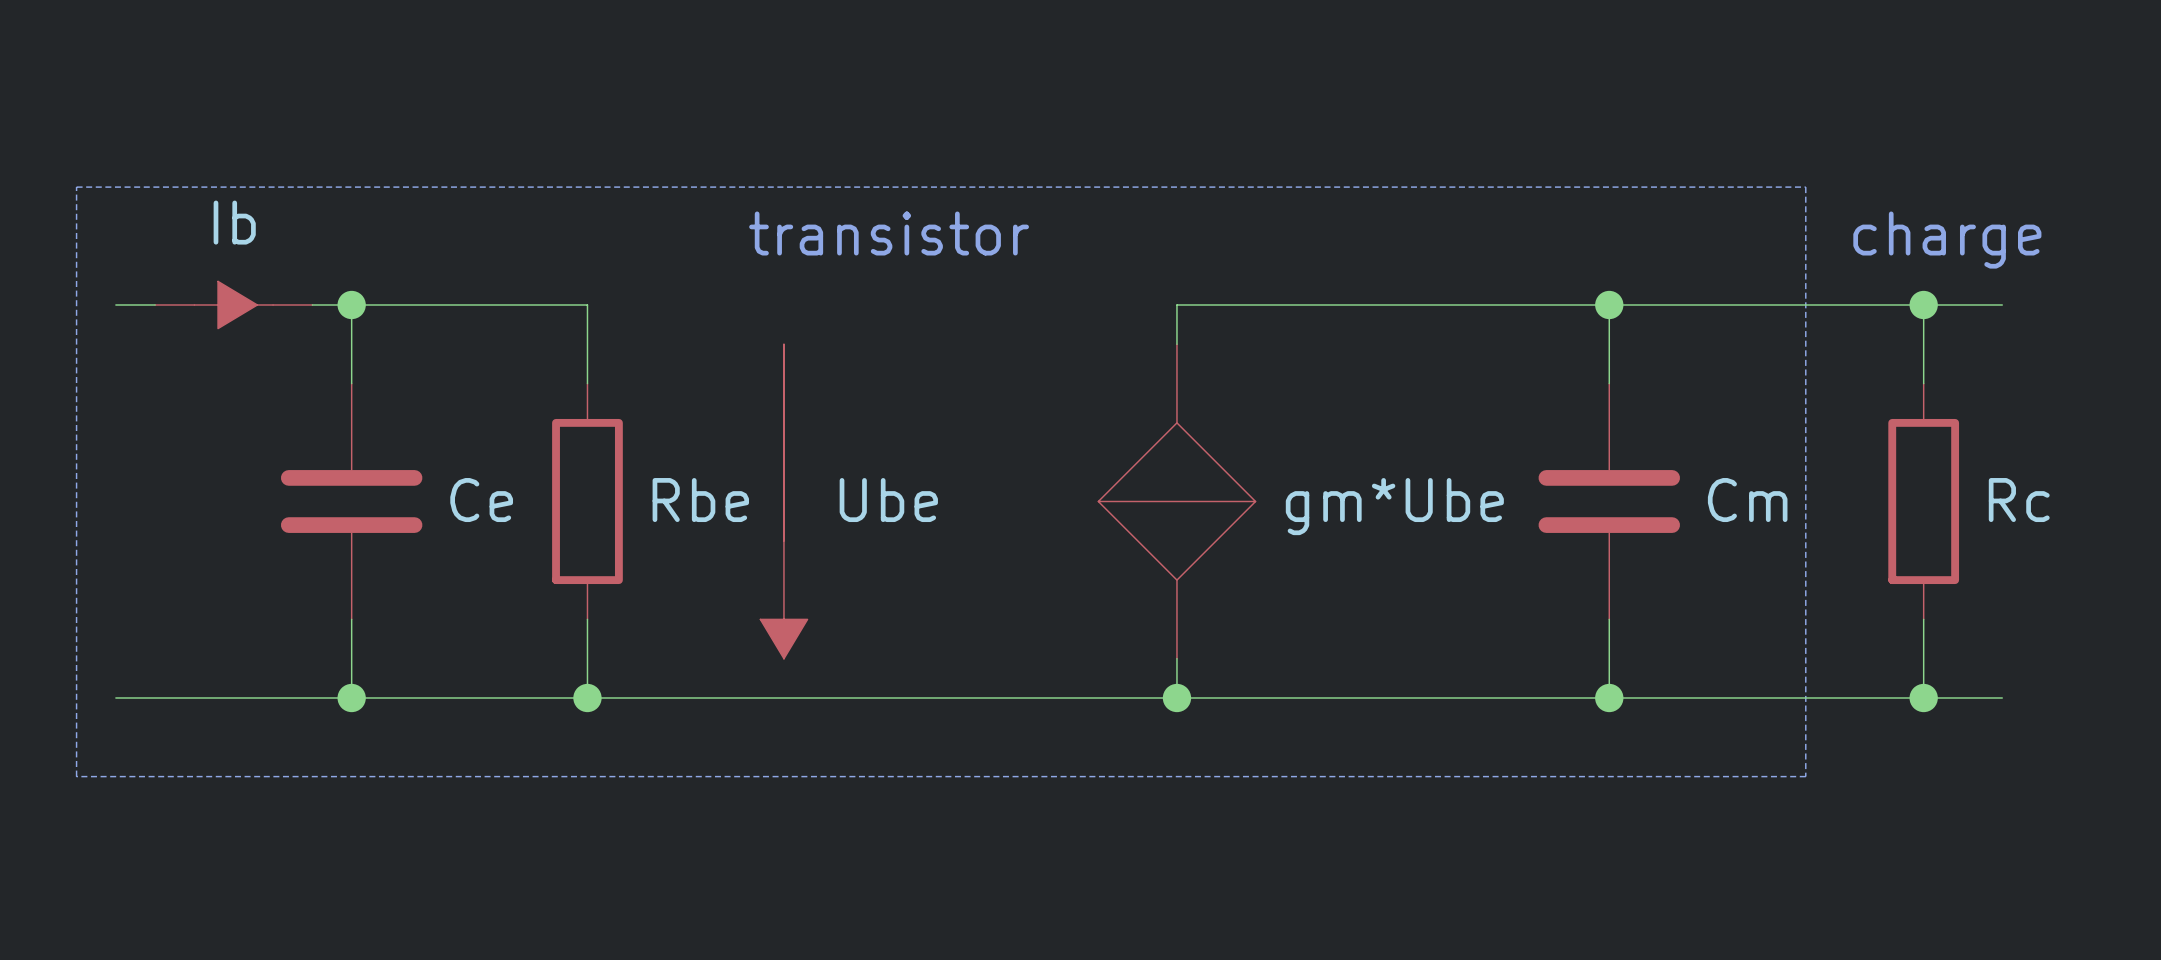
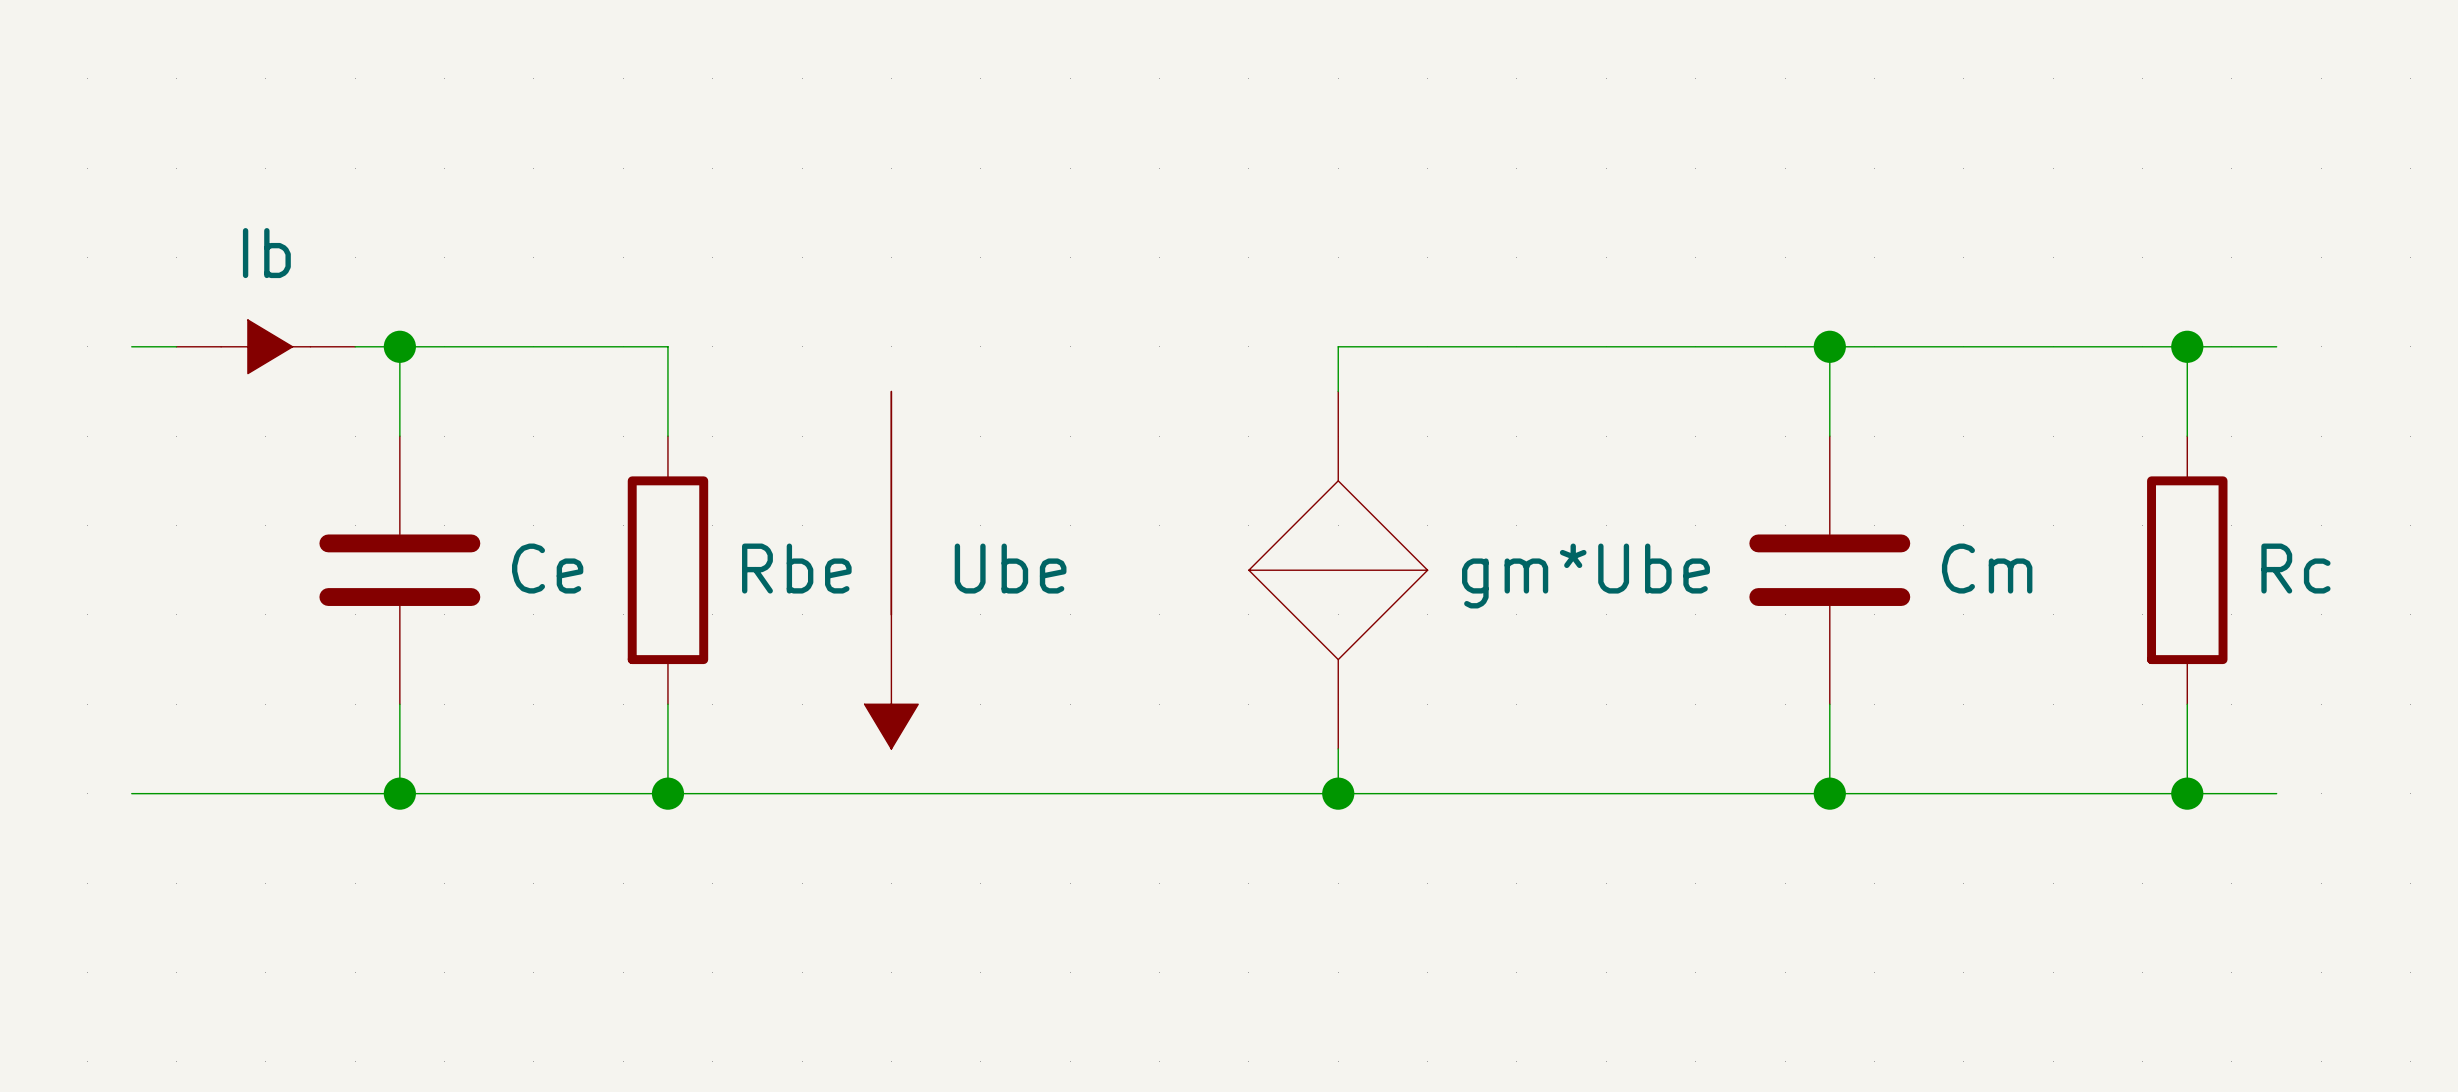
line: (76, 187) (1805, 187) (1805, 776) (76, 776) (76, 187) -> none
text: transistor (889, 233) -> none
text: charge (1947, 240) -> none

